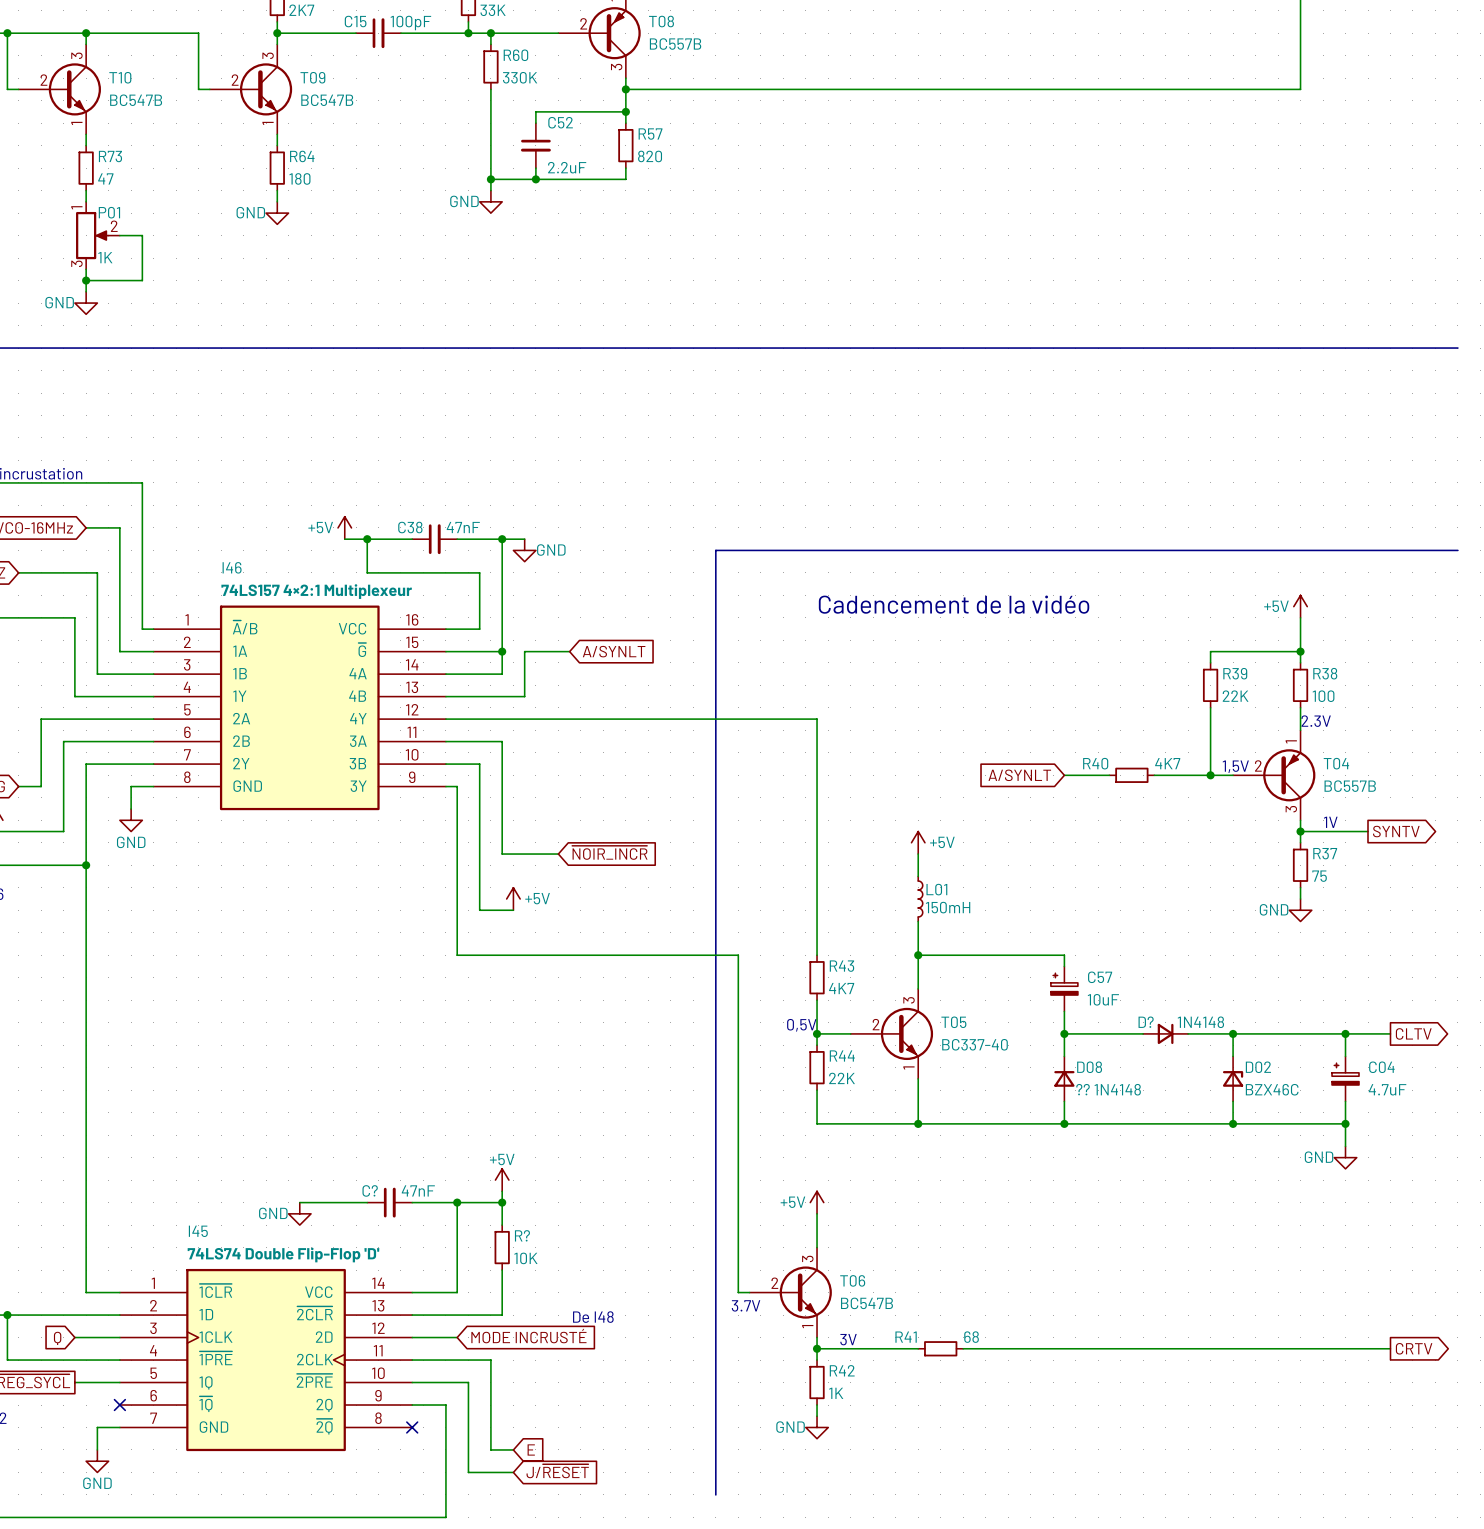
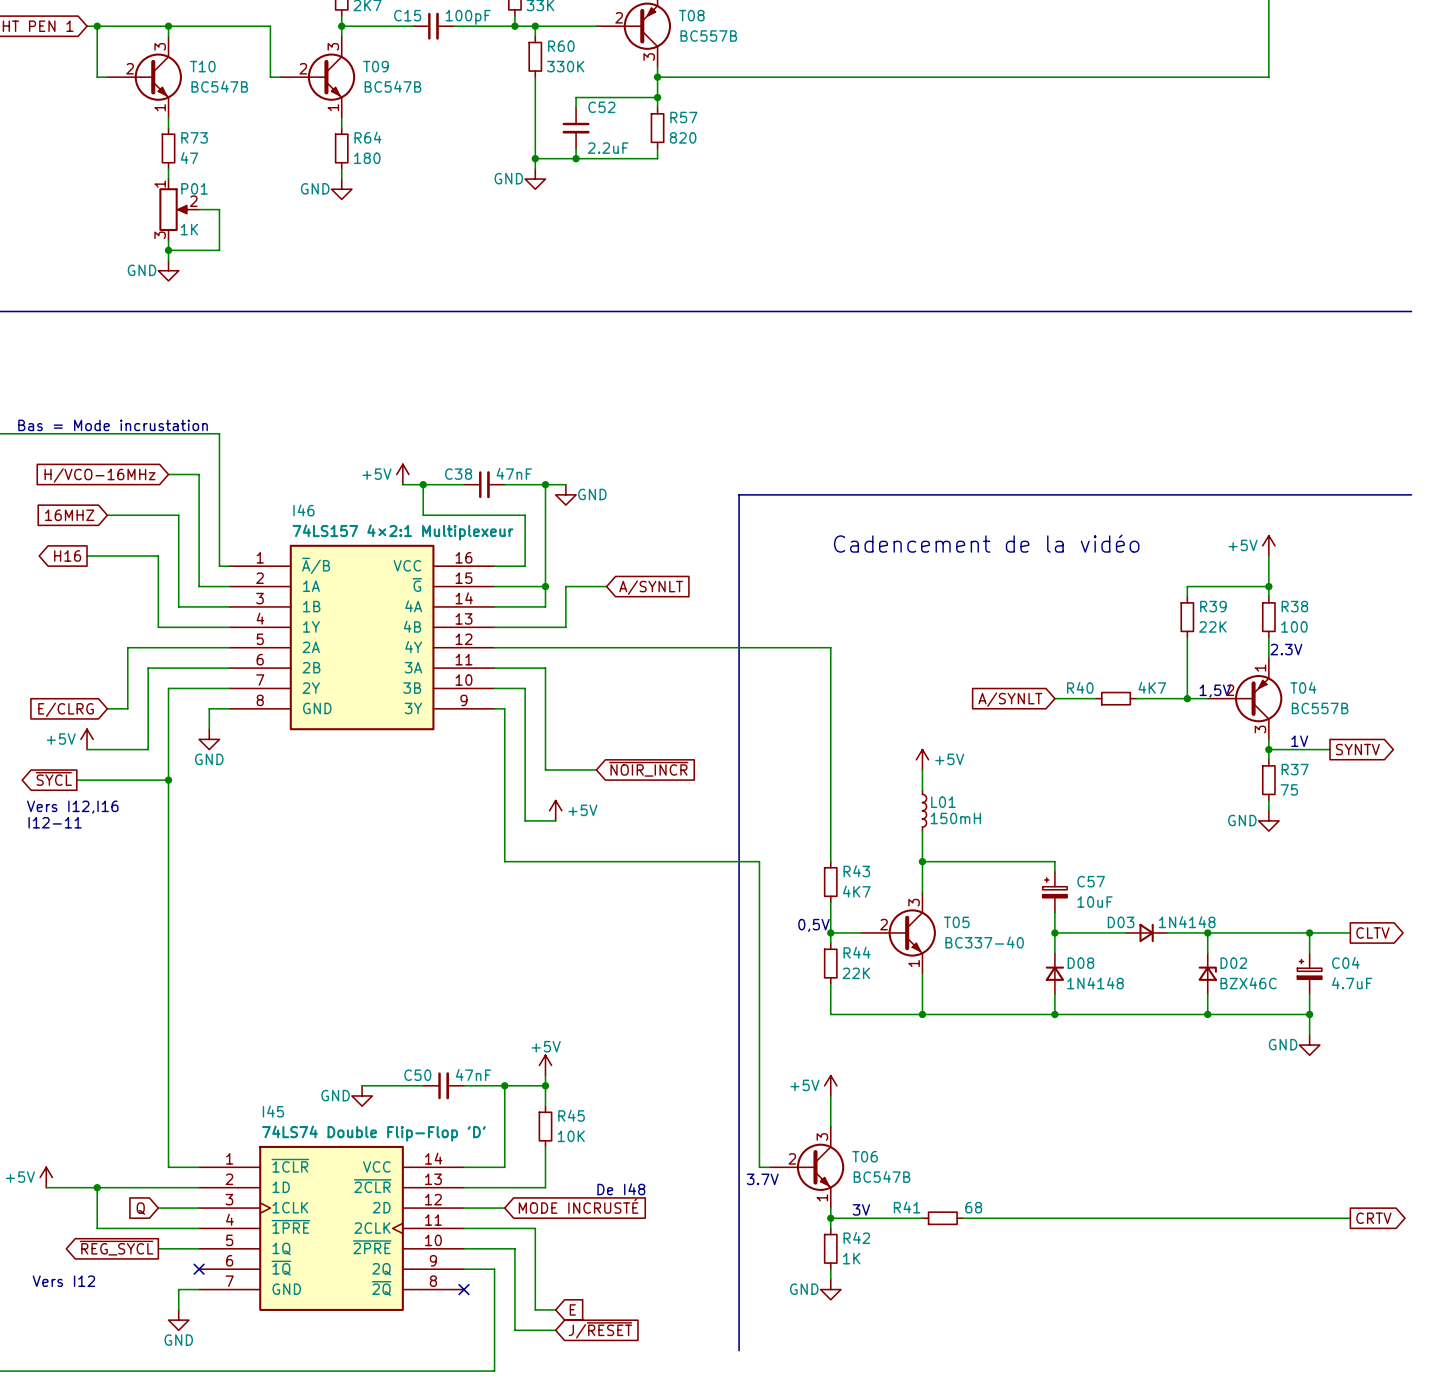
D? name: D? (1146, 1022) -> D03 (1121, 922)
D08 value: ?? 1N4148 (1108, 1089) -> 1N4148 (1095, 983)
C? name: C? (370, 1190) -> C50 (417, 1075)
R? name: R? (522, 1235) -> R45 (571, 1115)

